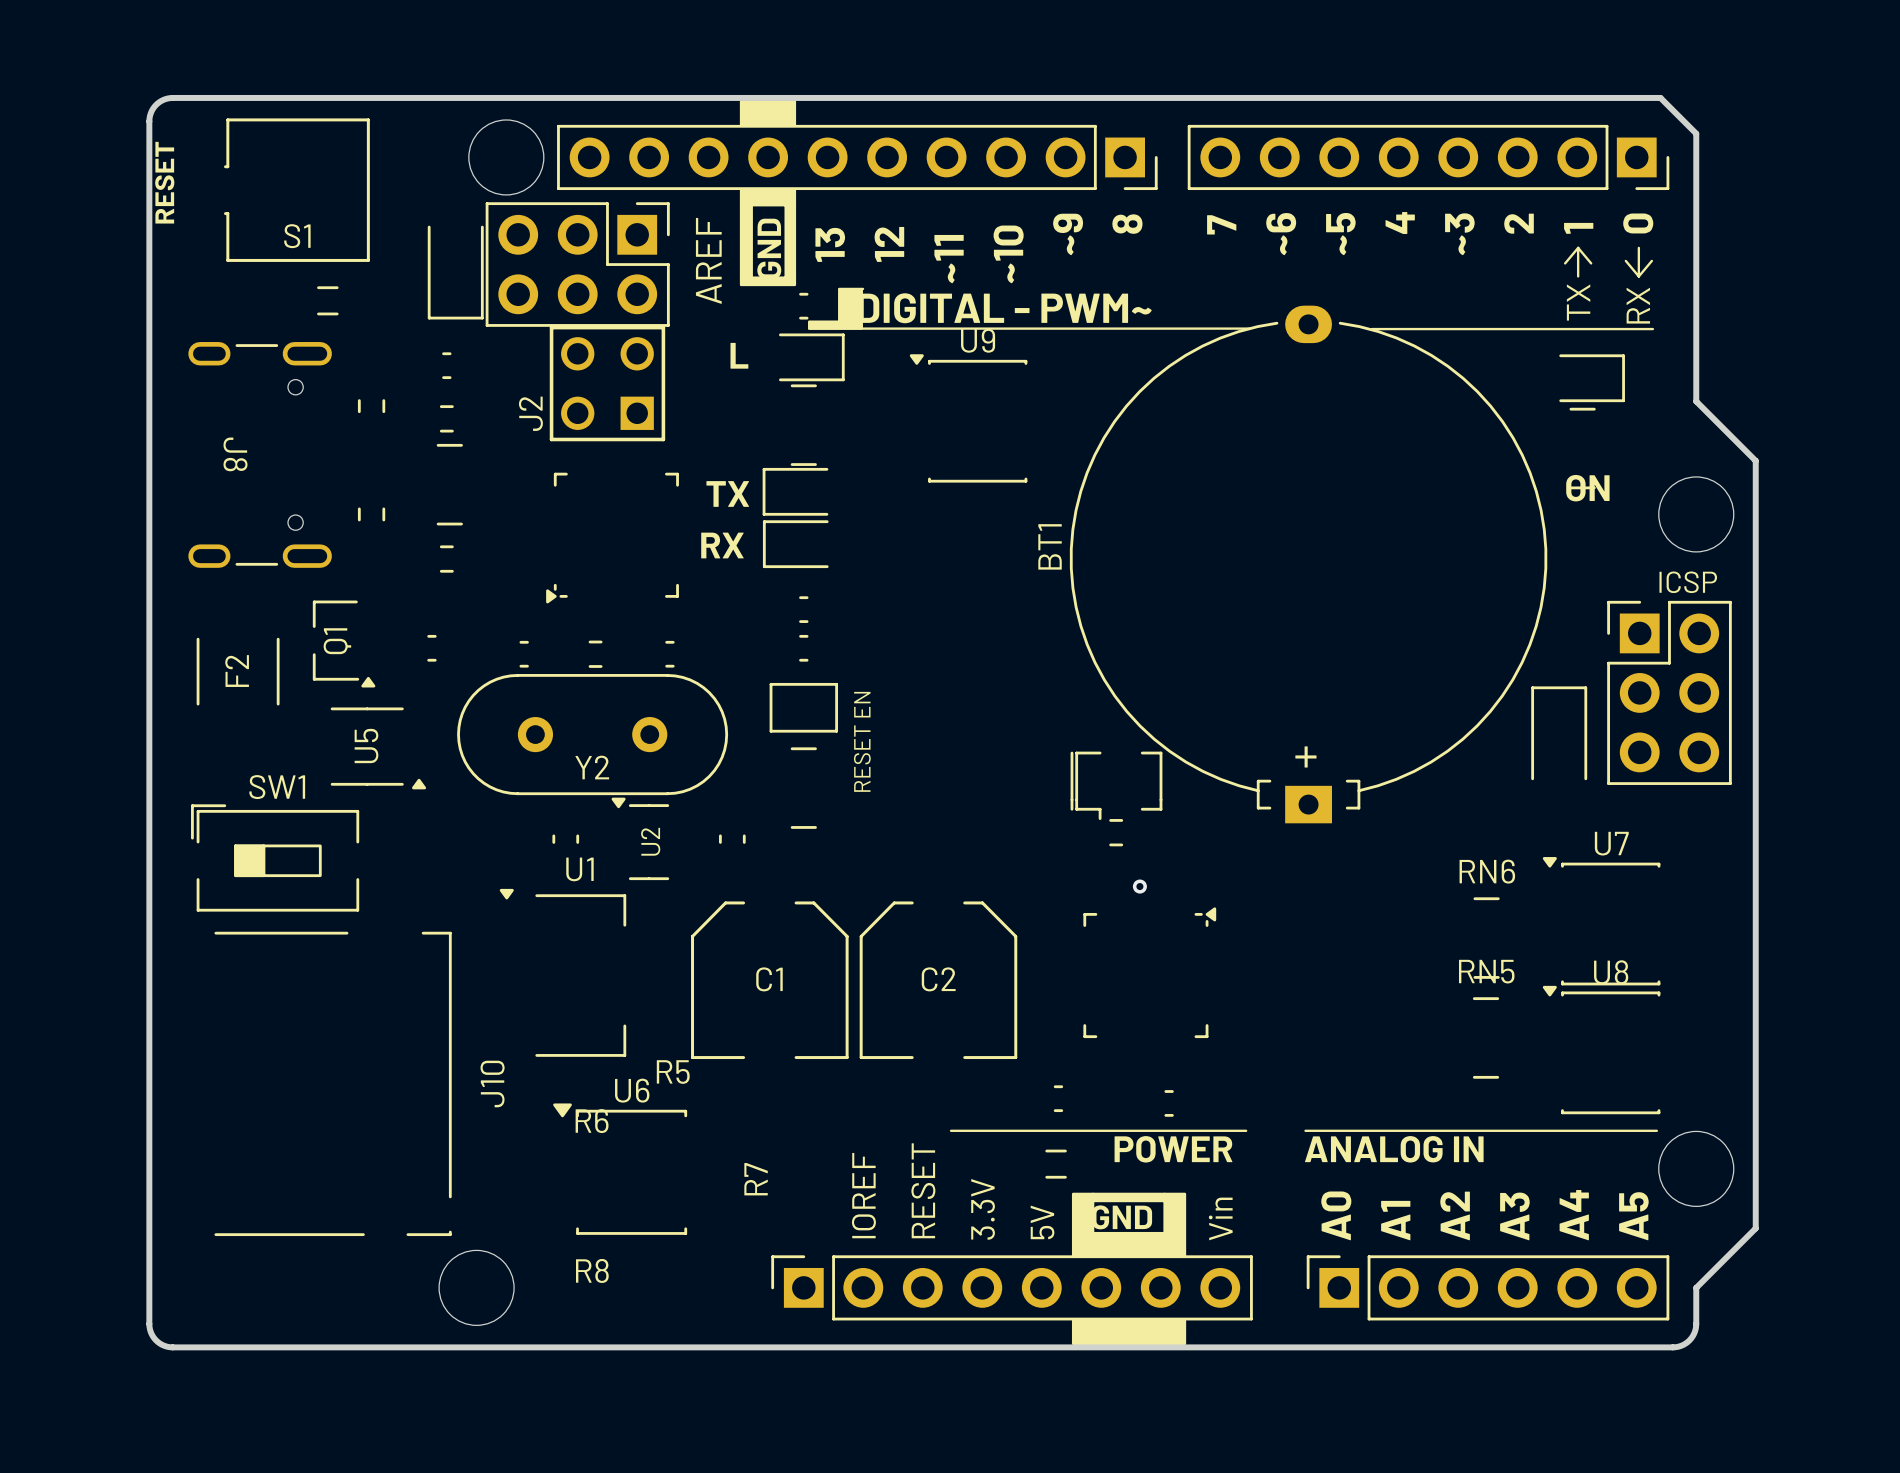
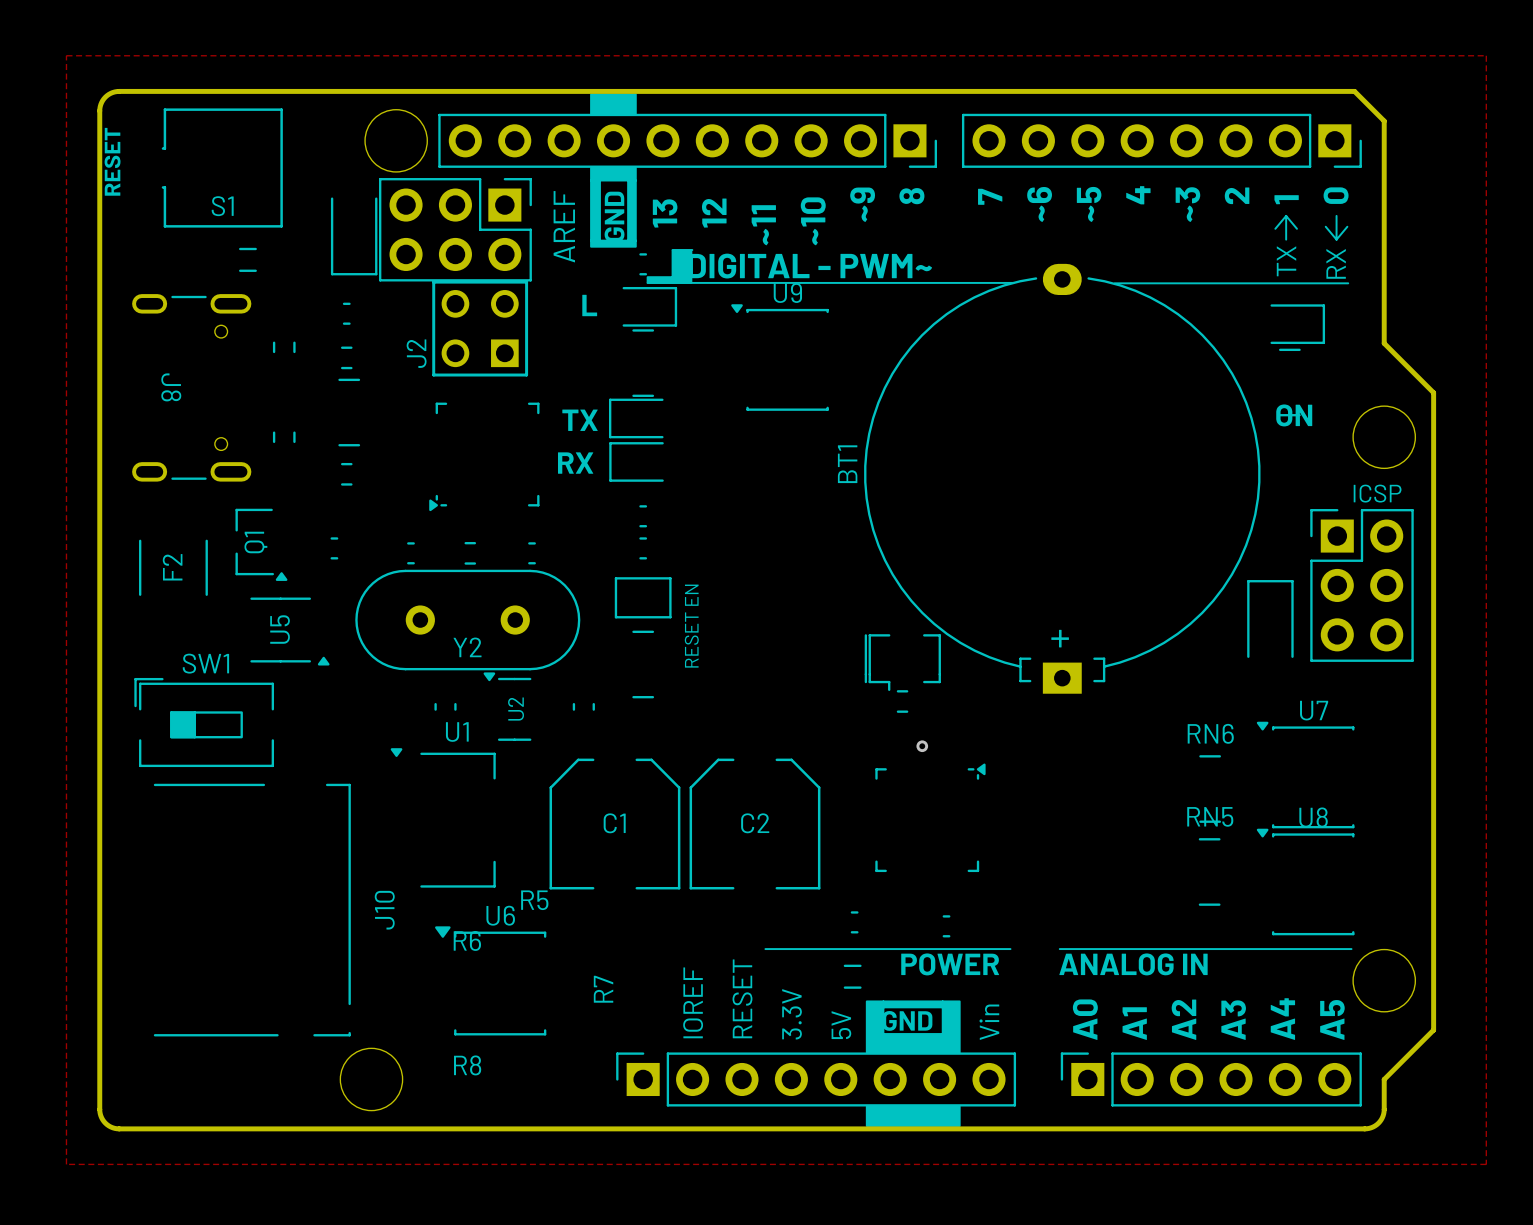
zone outline: none -> (66, 55) (1486, 55) (1486, 1164) (66, 1164) (66, 55)

